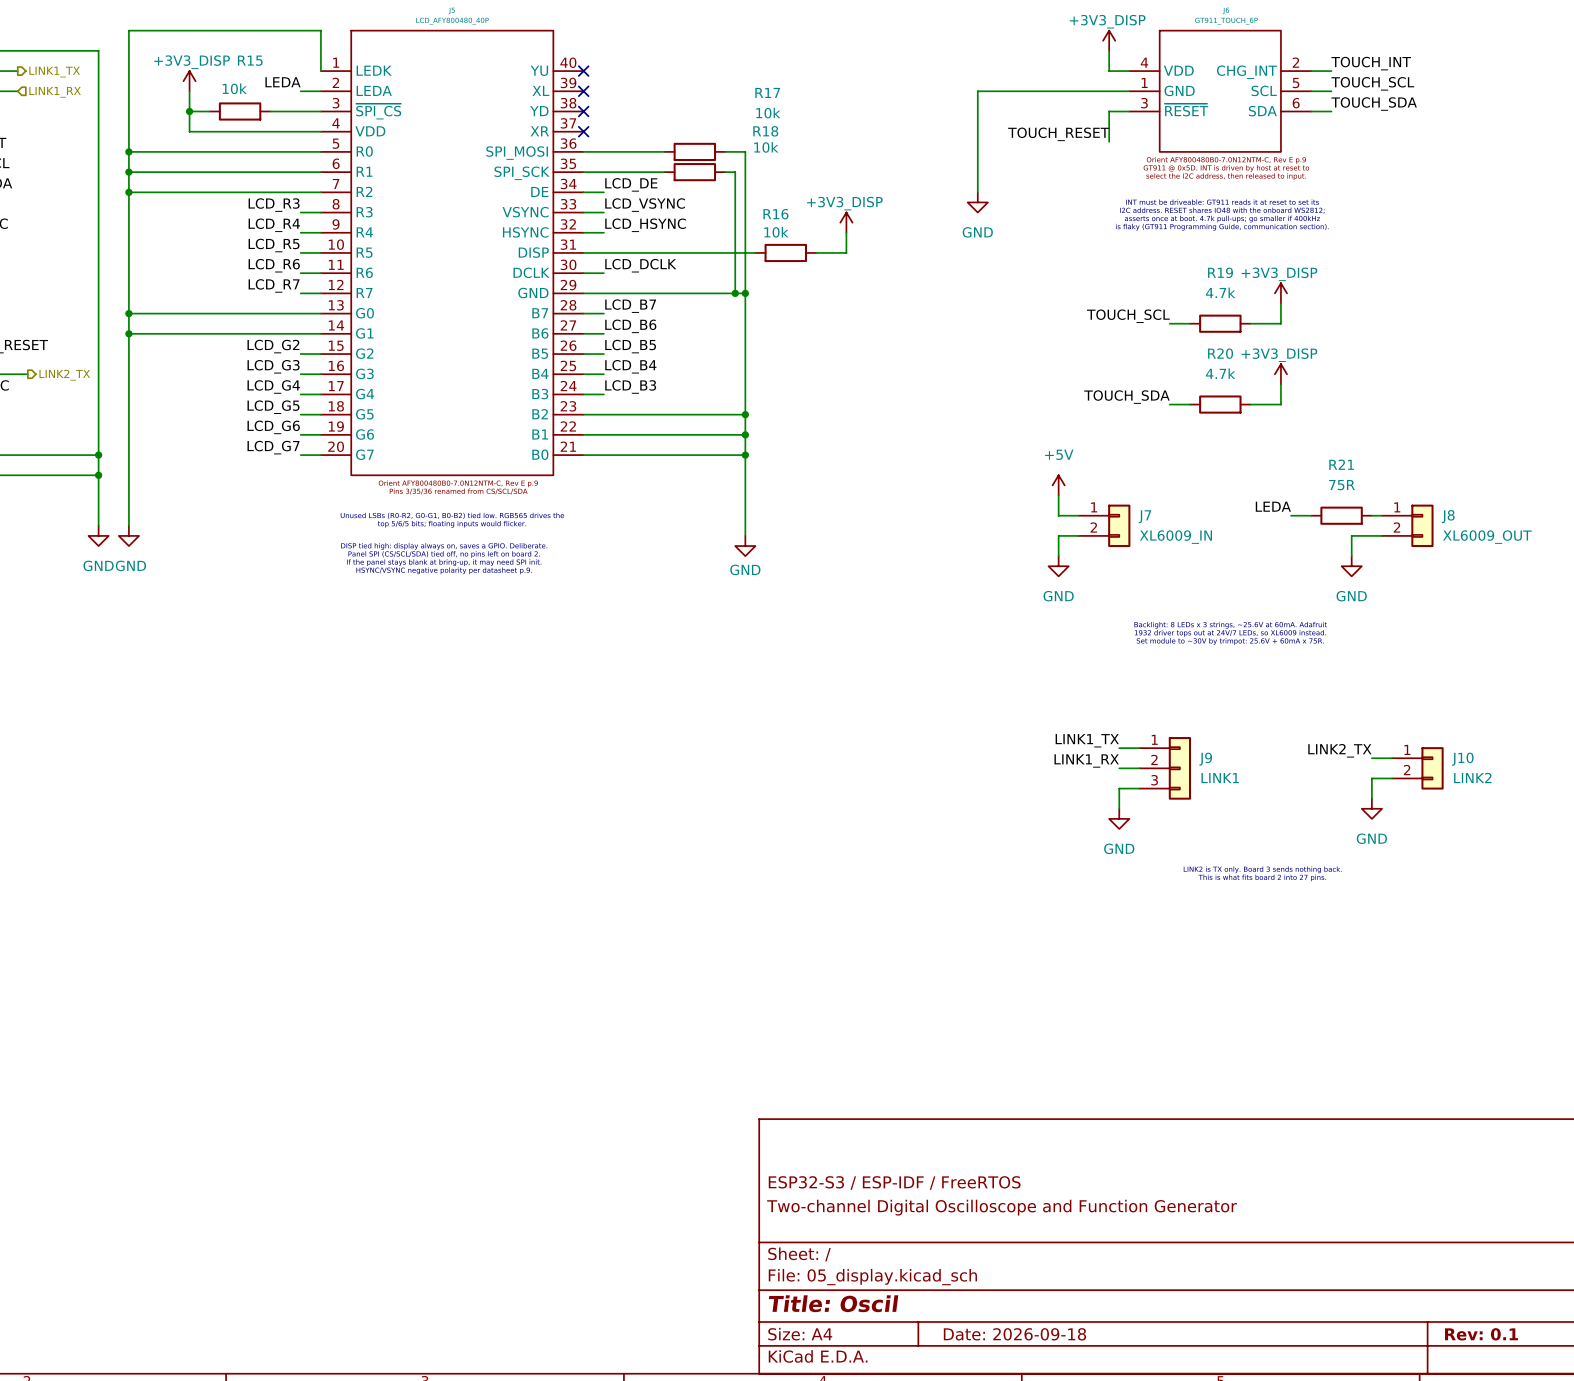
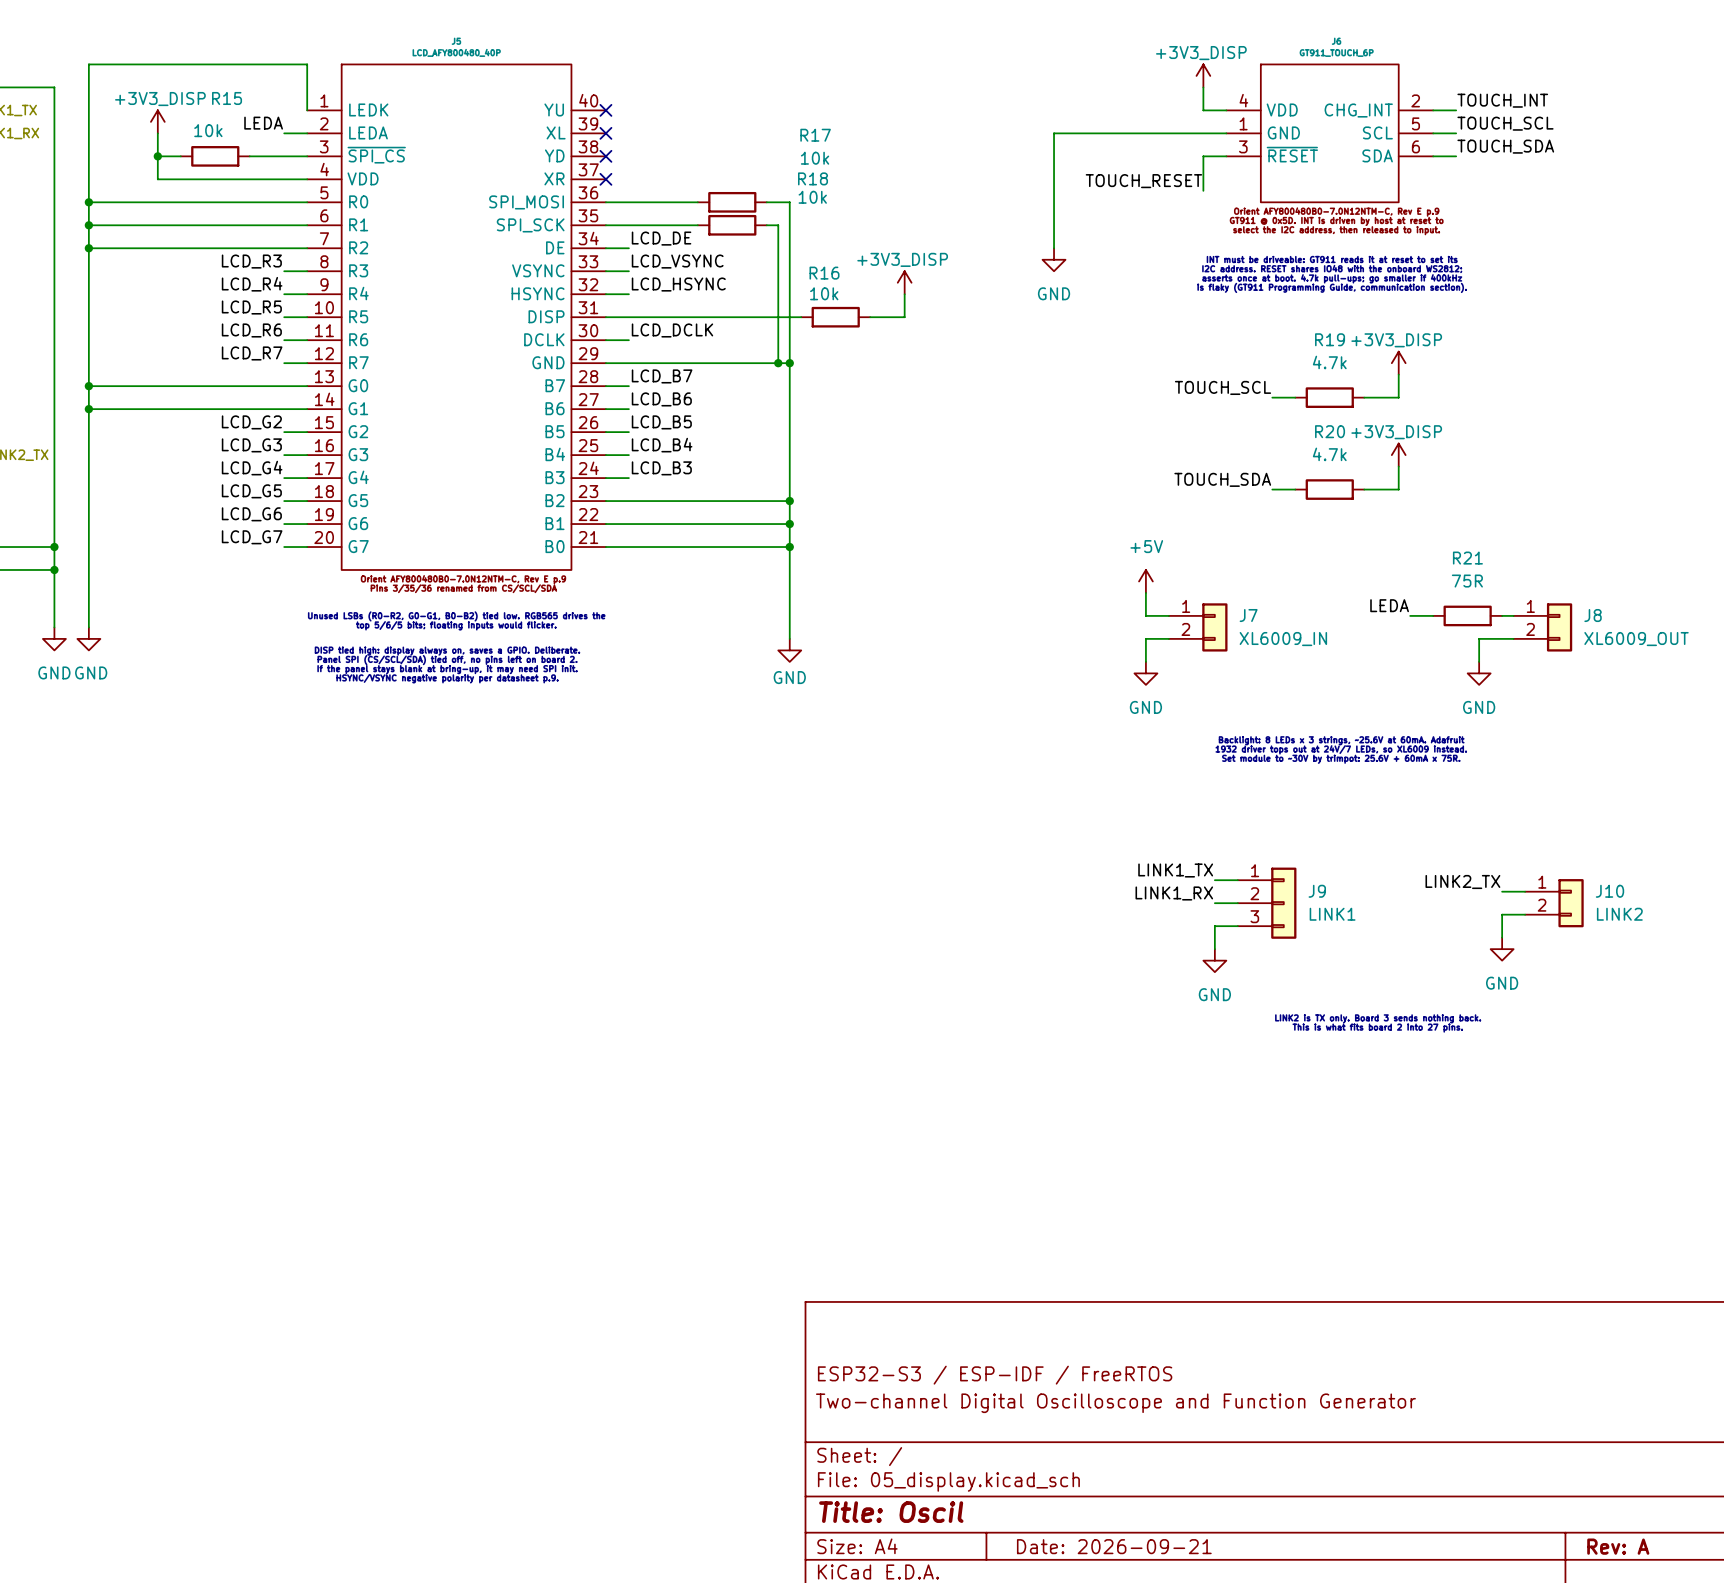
title block: Date: 2026-09-18 (1014, 1334) -> Date: 2026-09-21 (1114, 1546)
title block: Rev: 0.1 (1481, 1334) -> Rev: A (1618, 1546)

